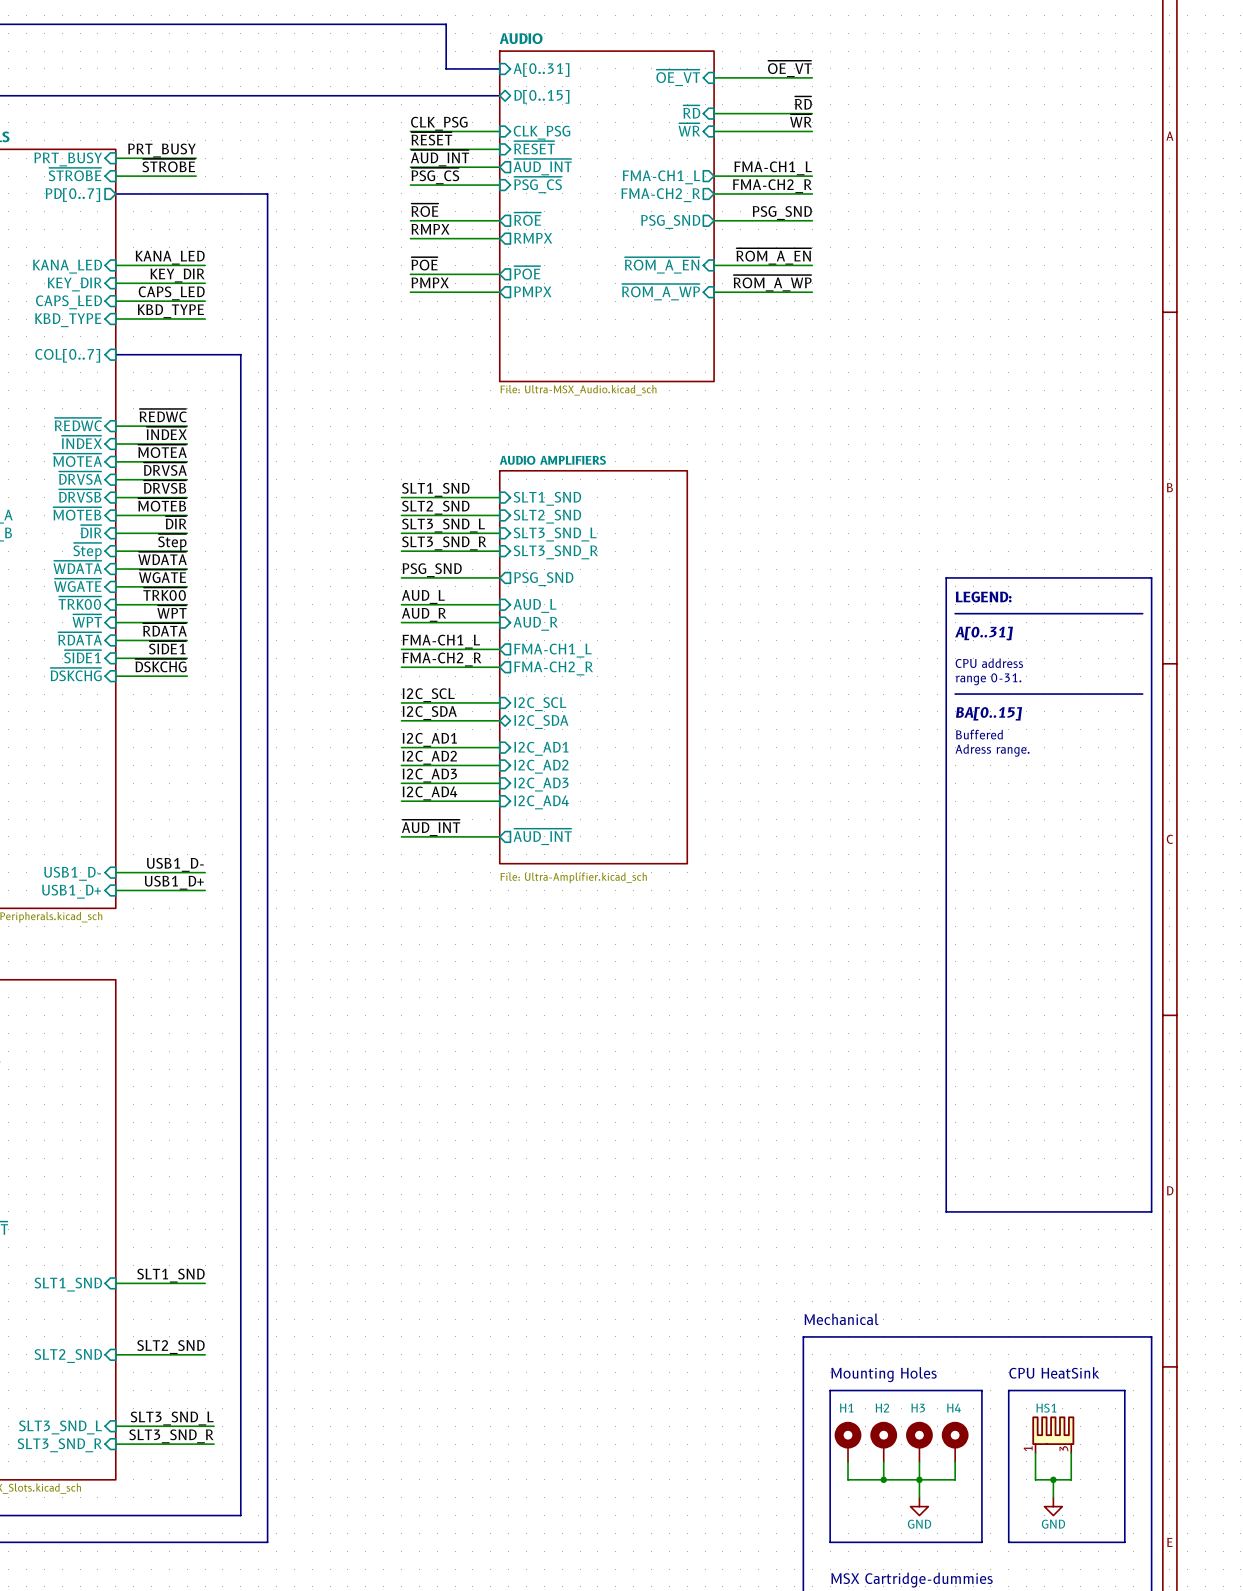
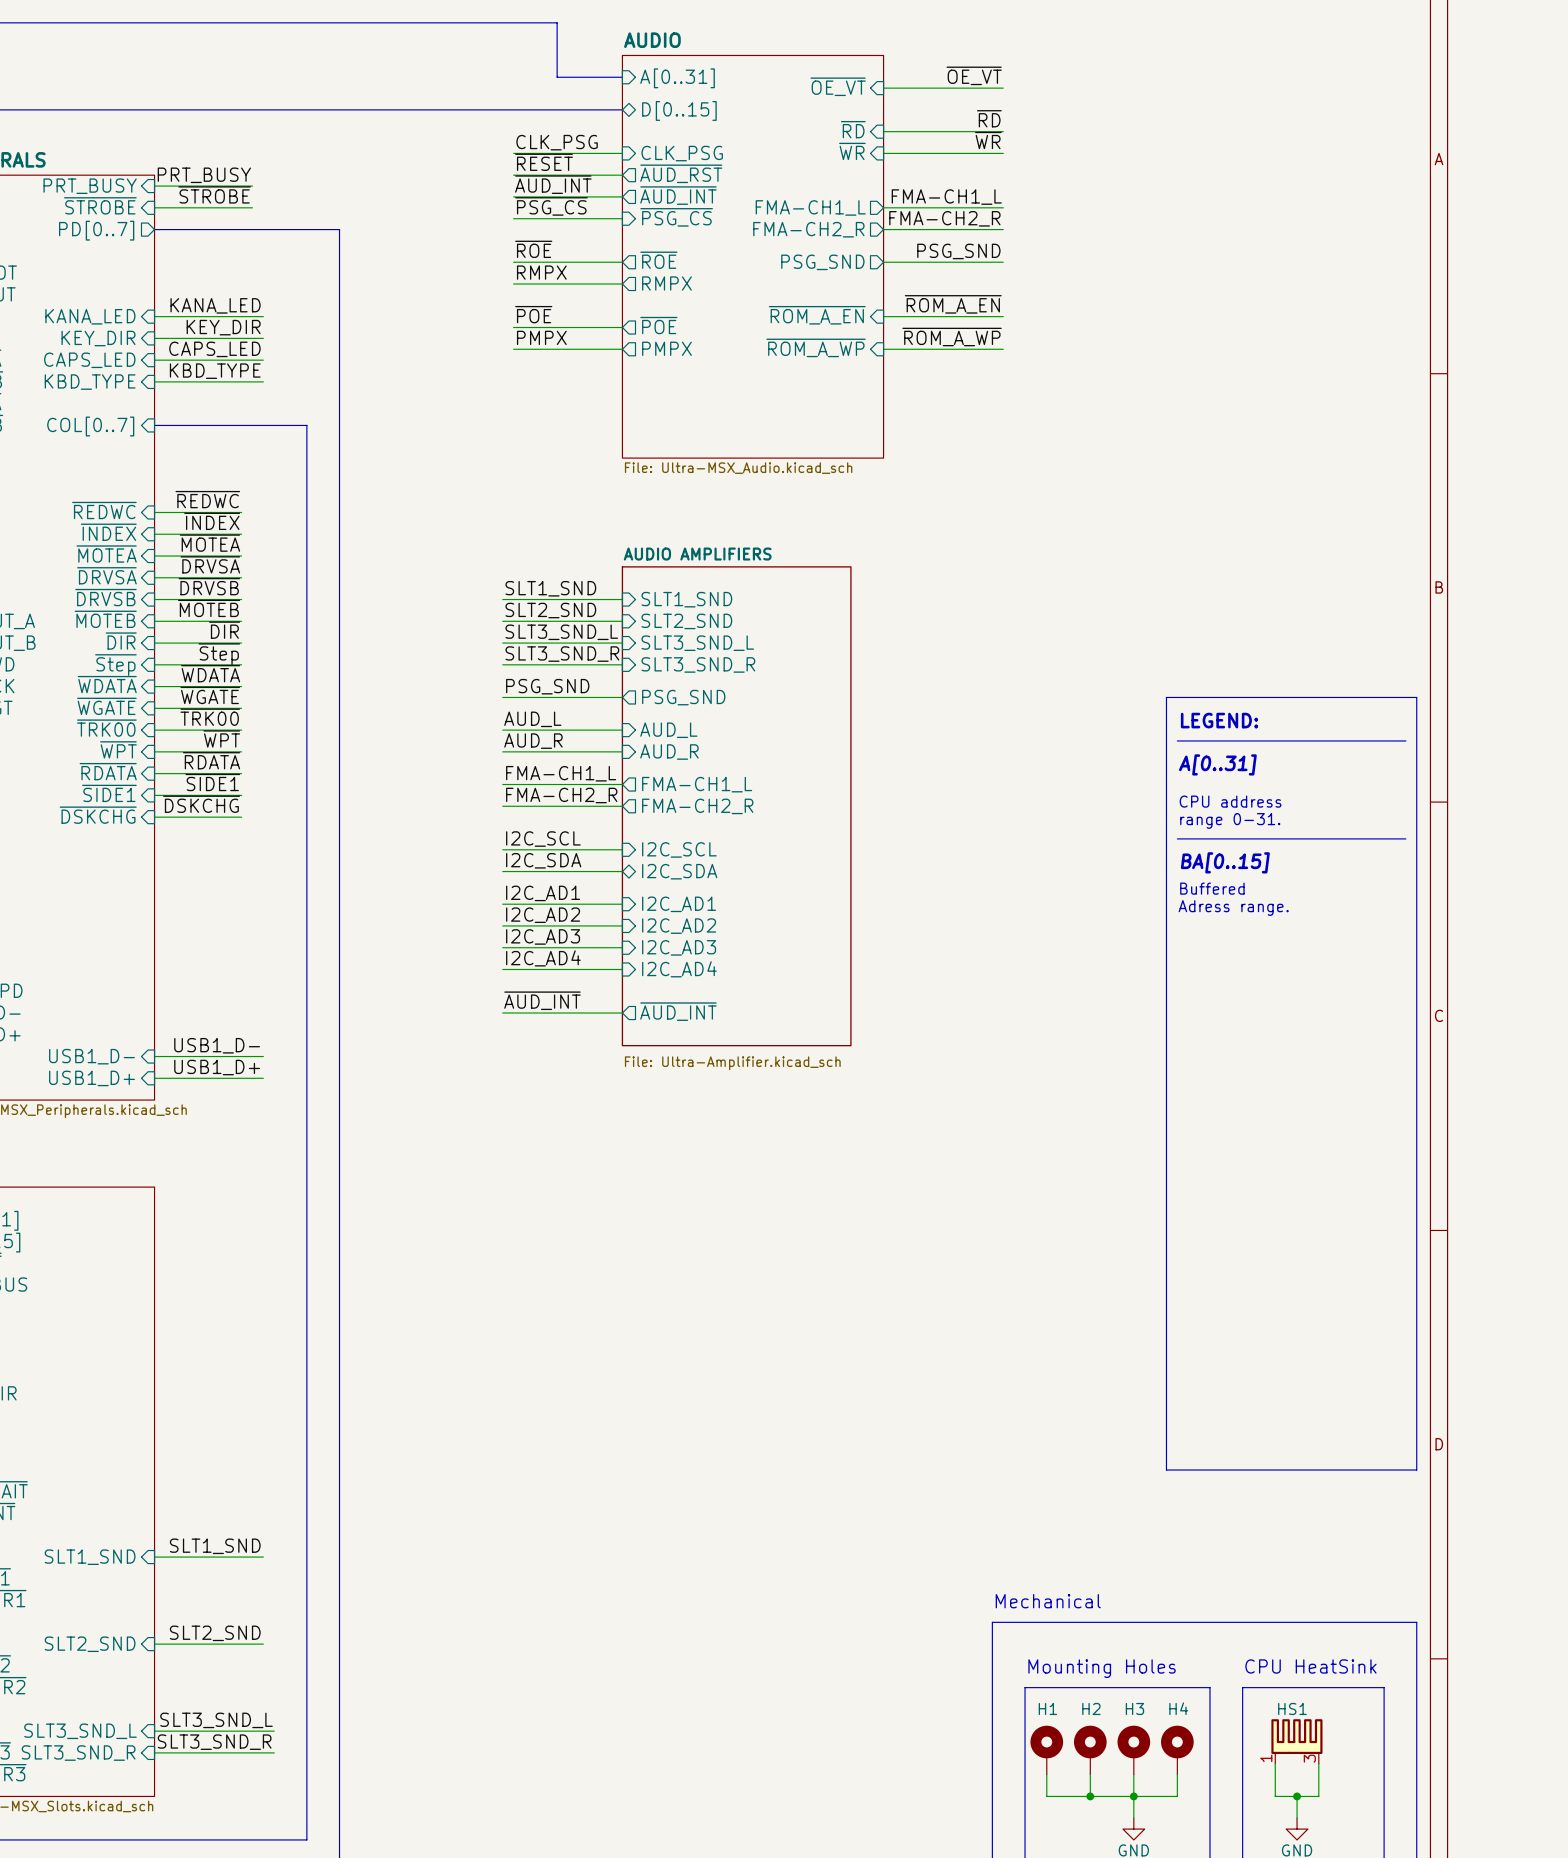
sheet pin shape: input (534, 147) -> output (681, 173)
sheet pin: ~{RESET} (534, 147) -> ~{AUD_RST} (681, 173)

